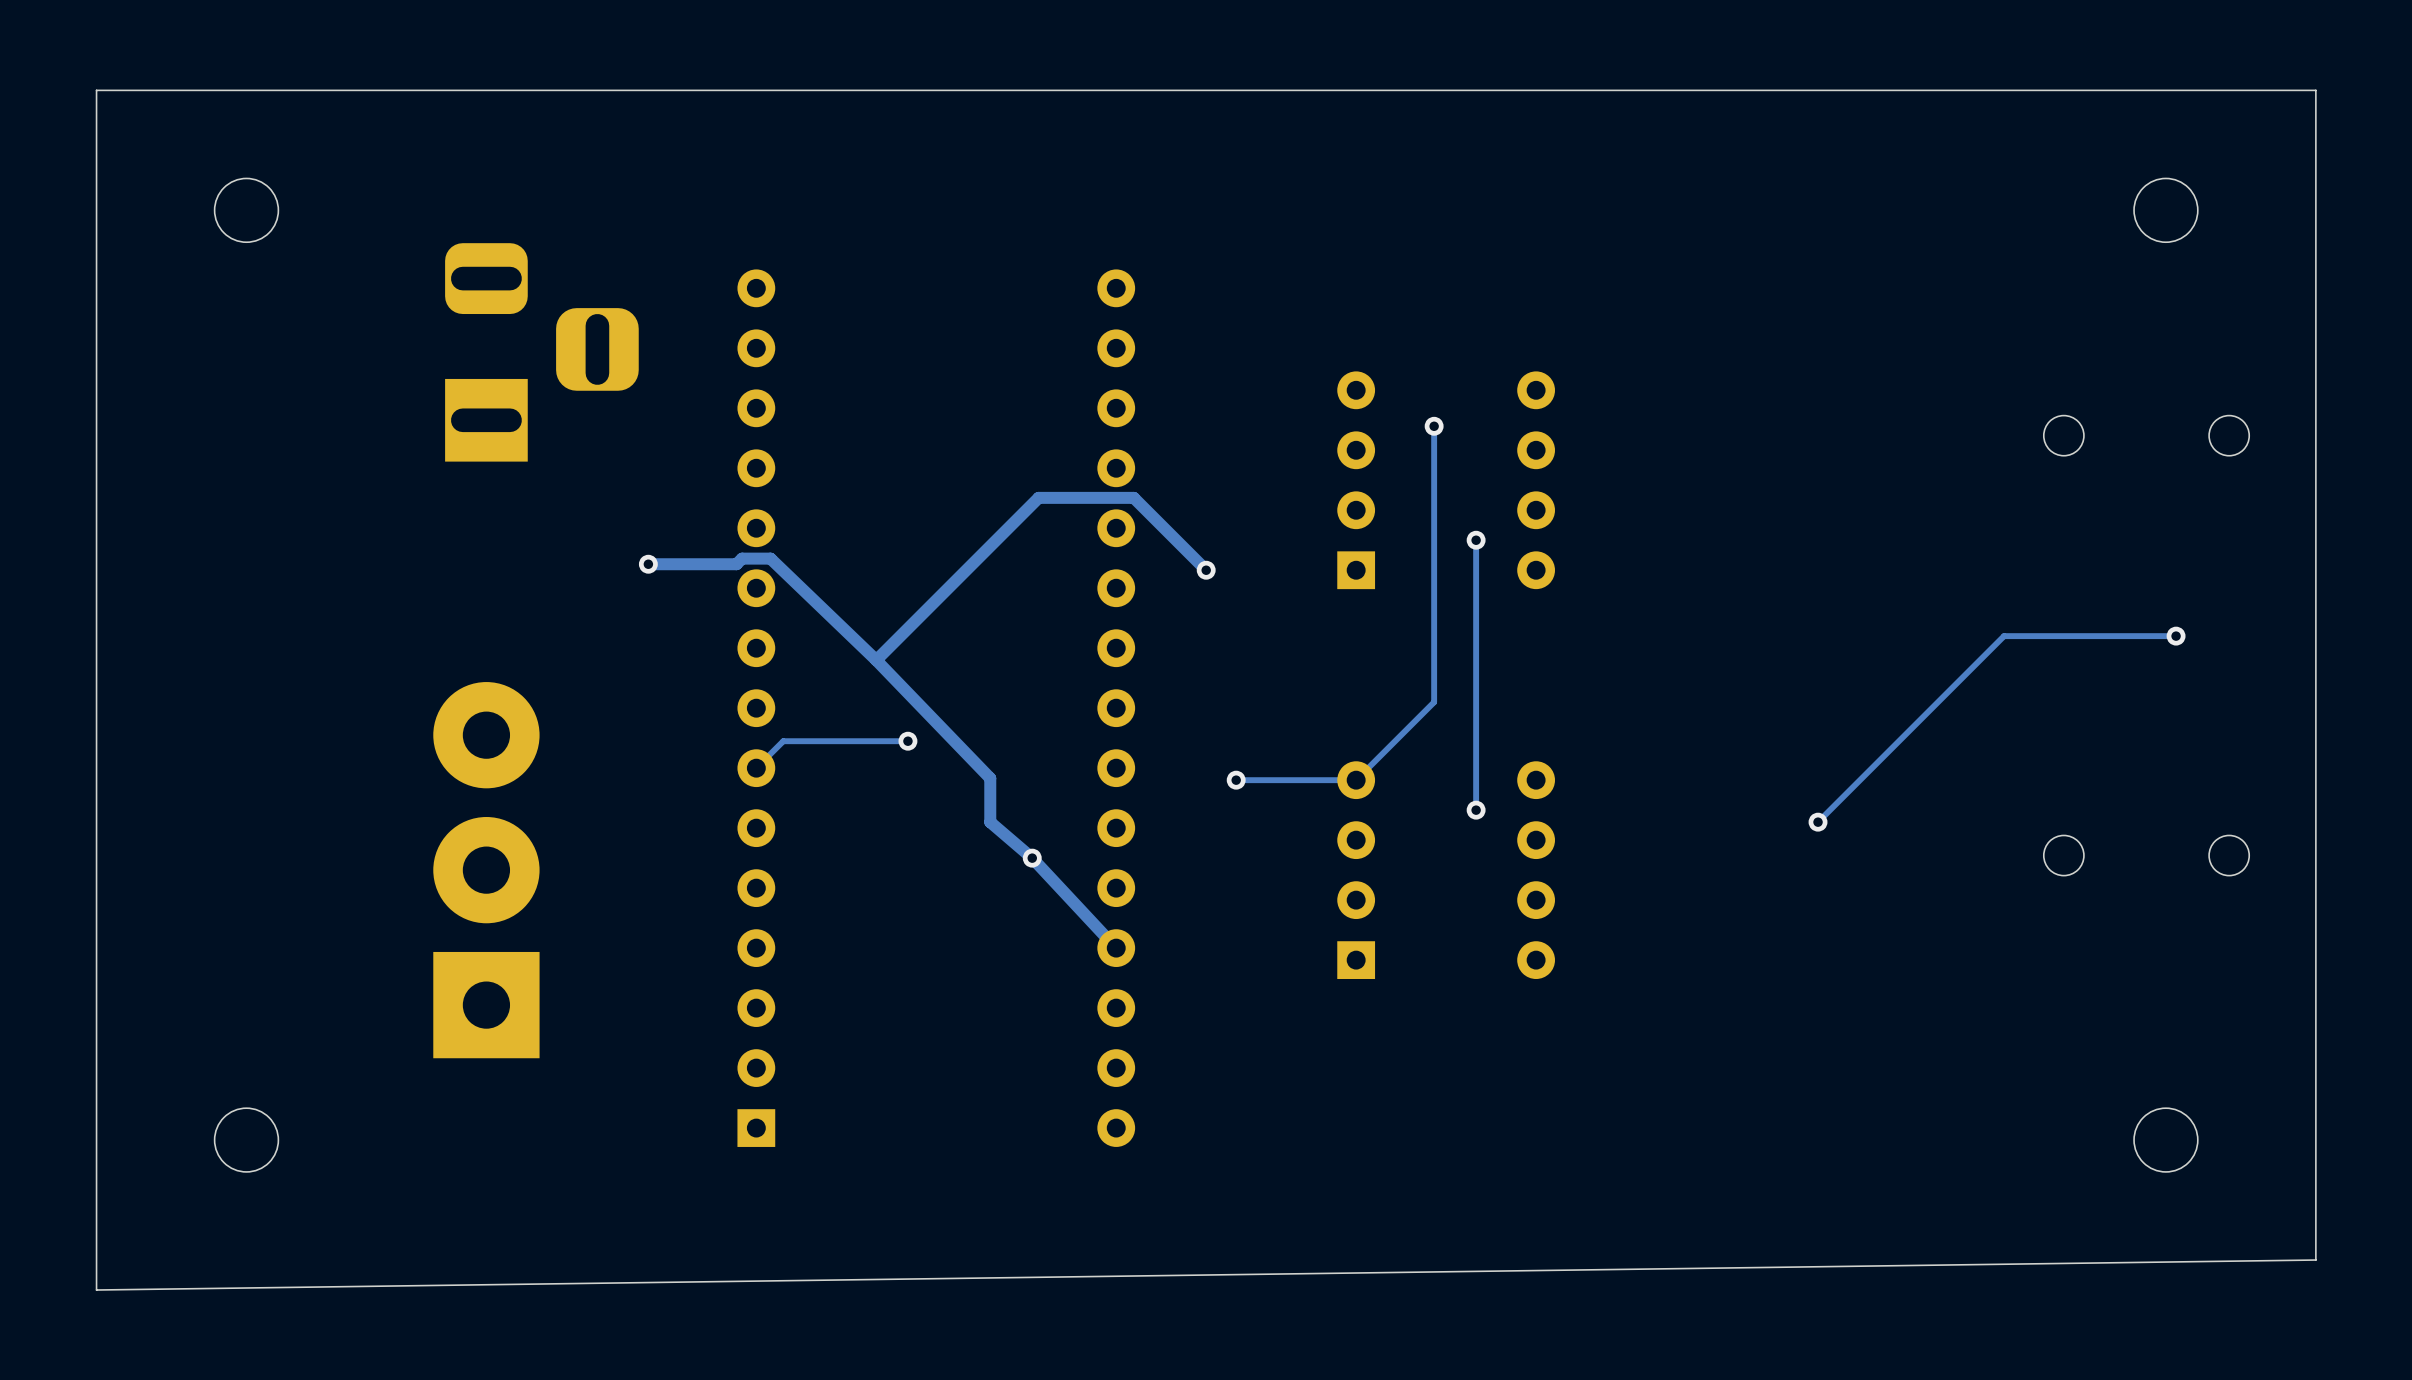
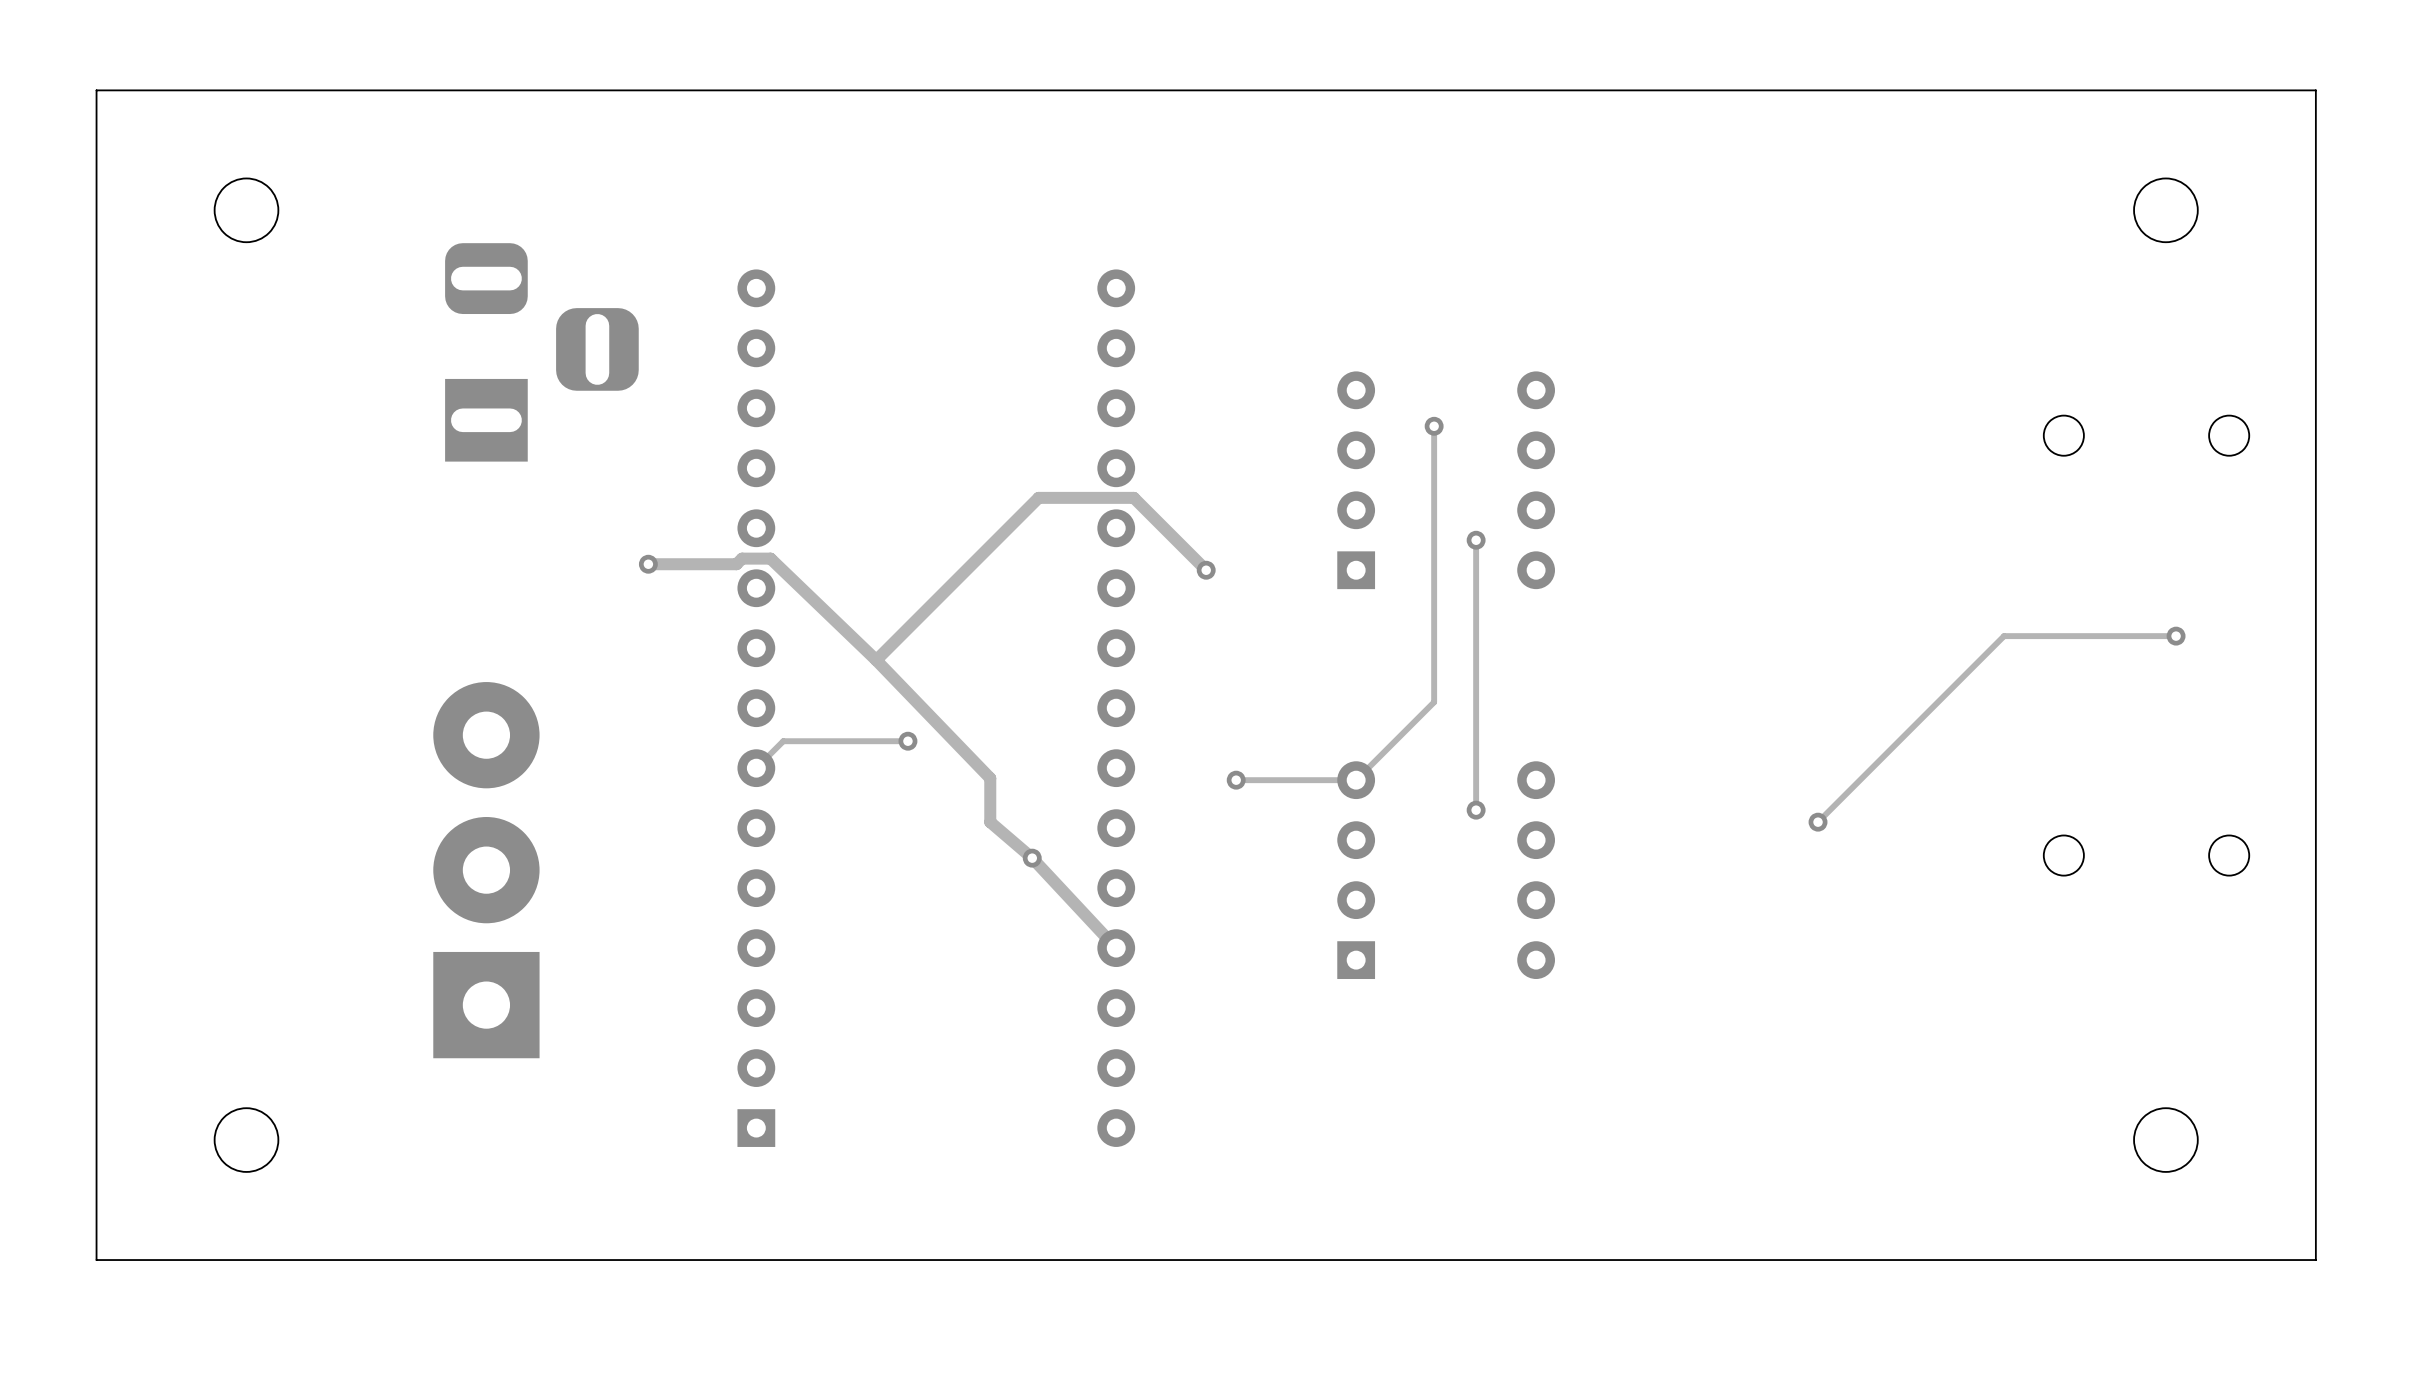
board edge: (2315, 1260) (96, 1290) (96, 1260) -> (2315, 1260) (96, 1260)

